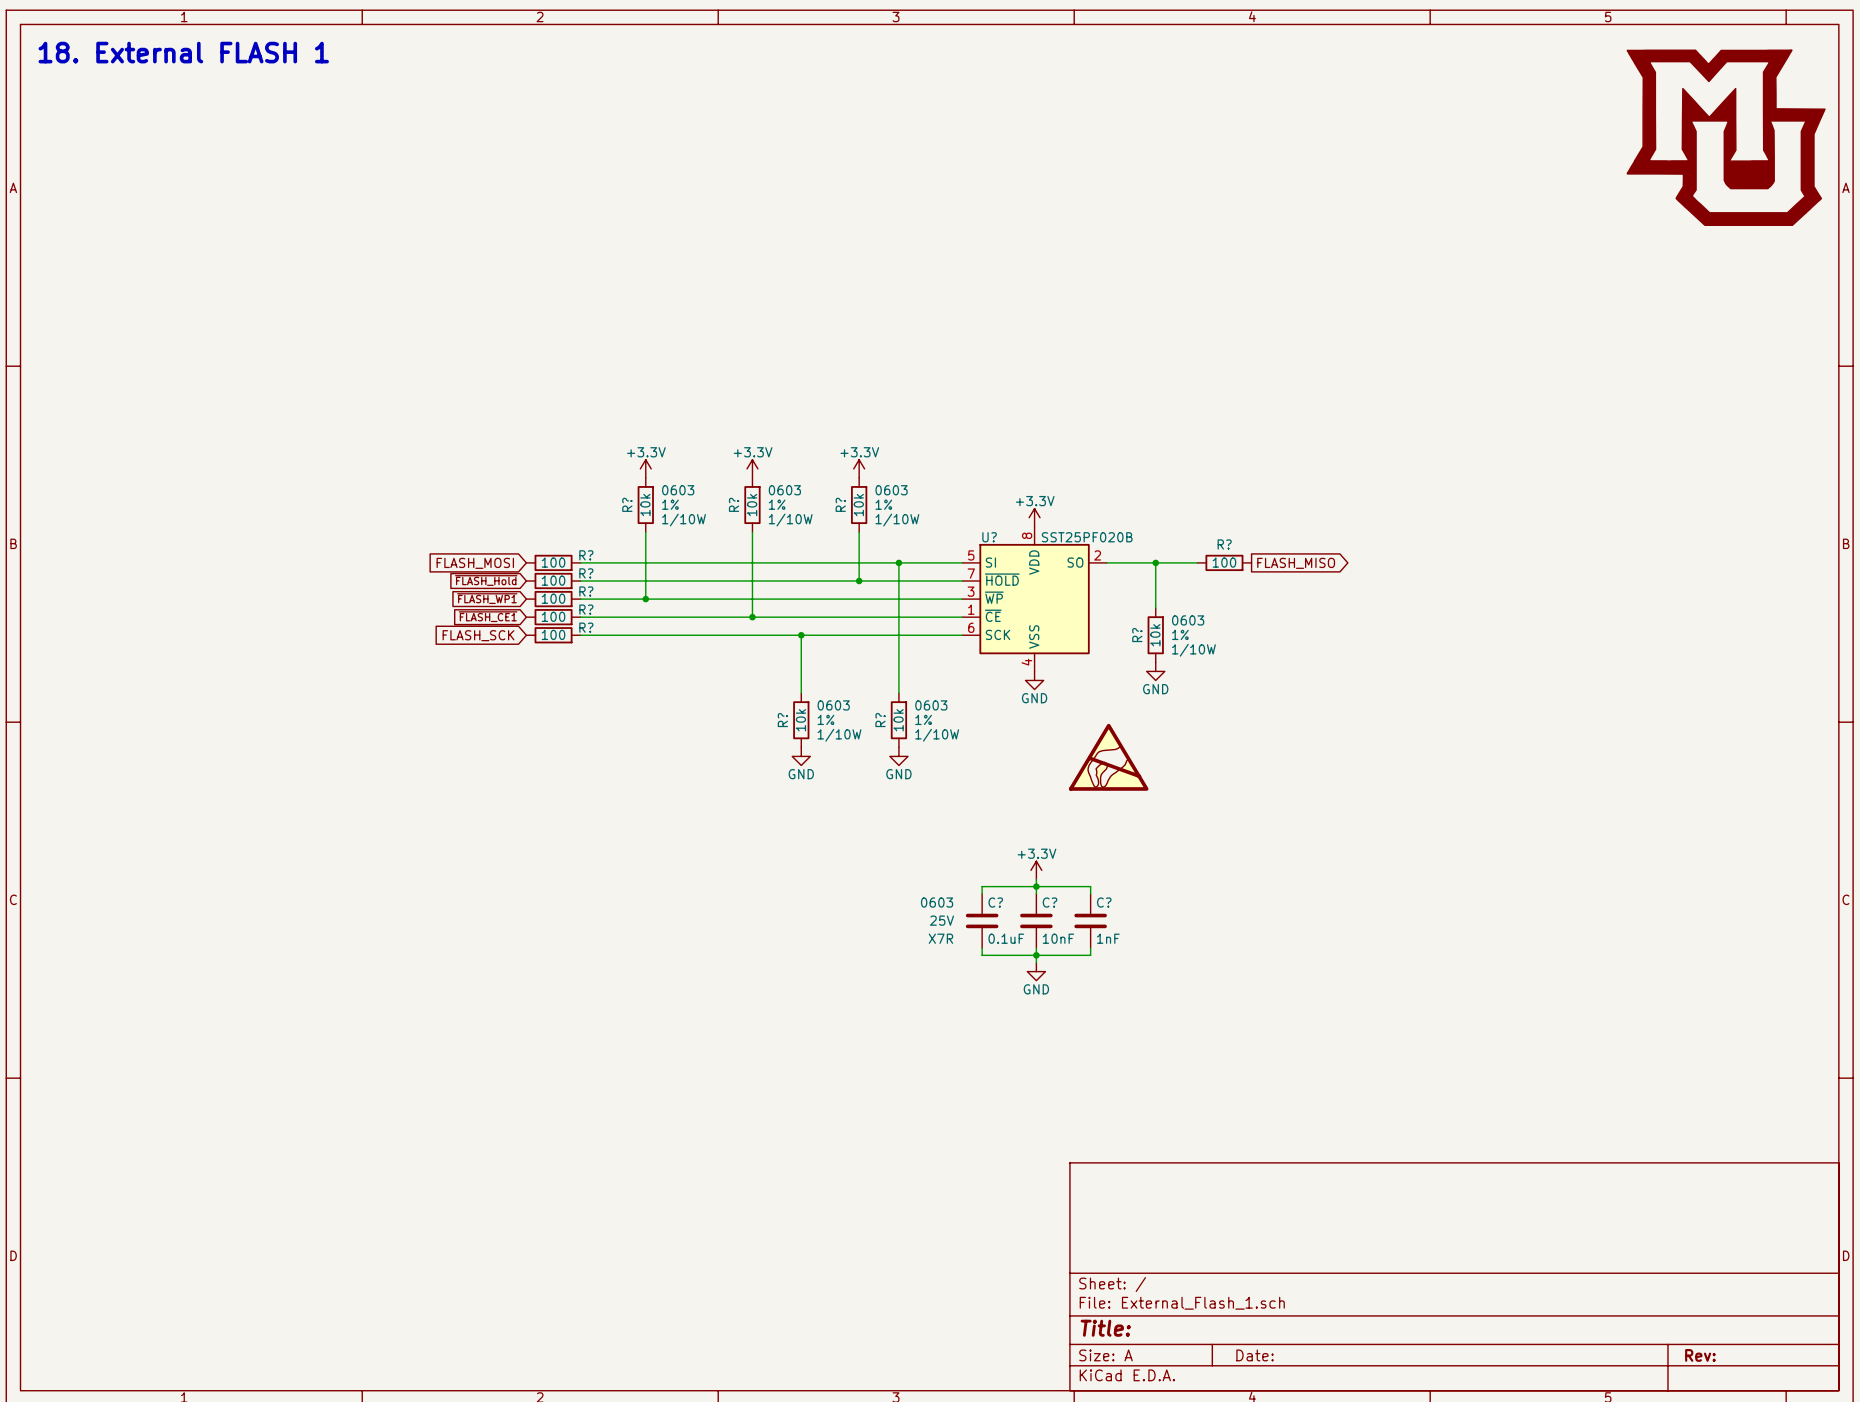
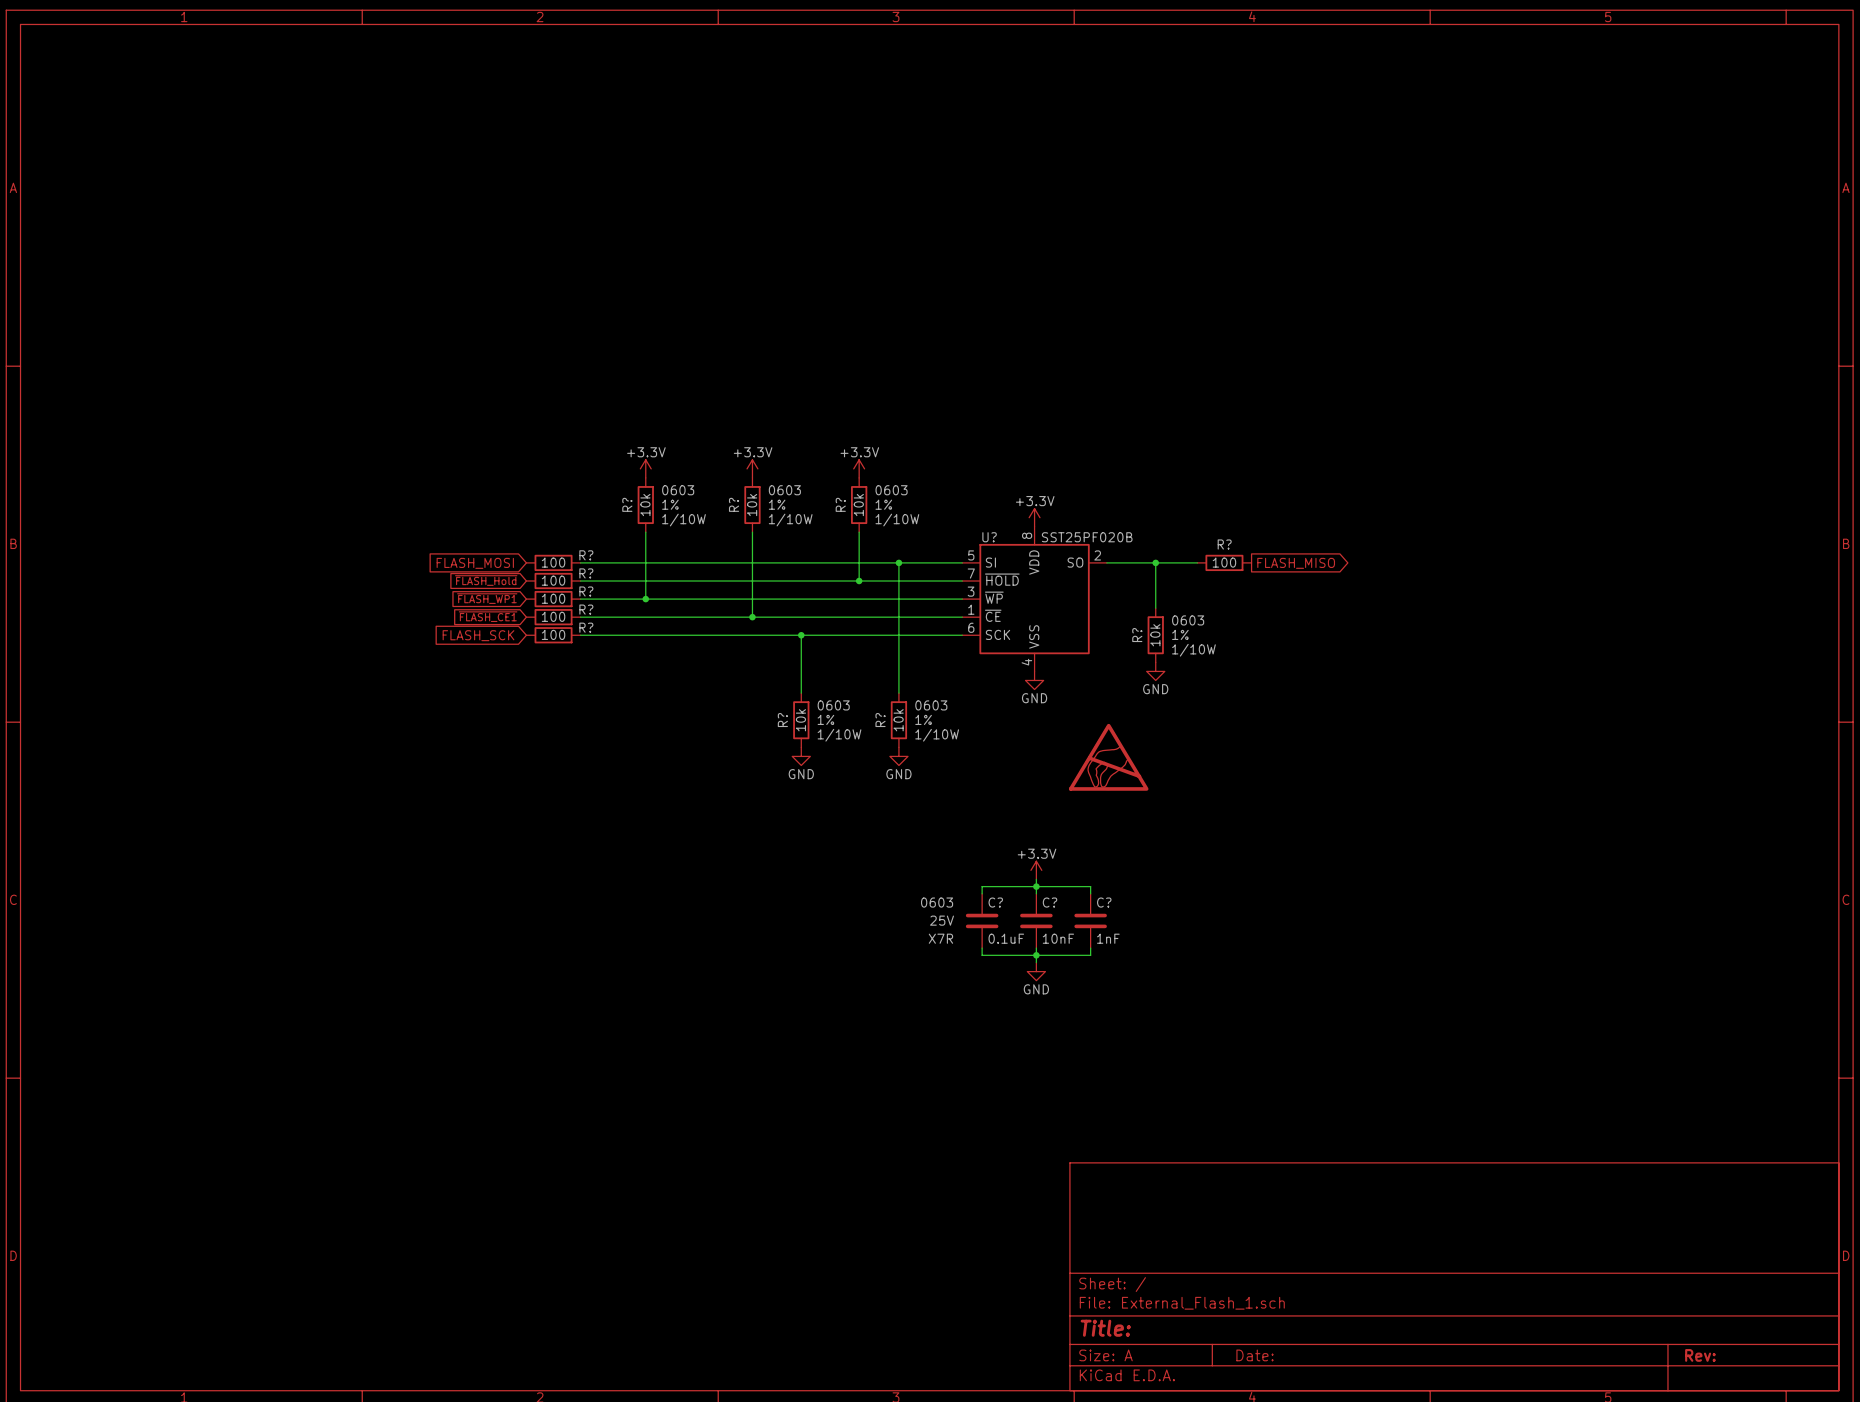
text: 18. External FLASH 1 (183, 52) -> none
power symbol: (1726, 137) -> none

